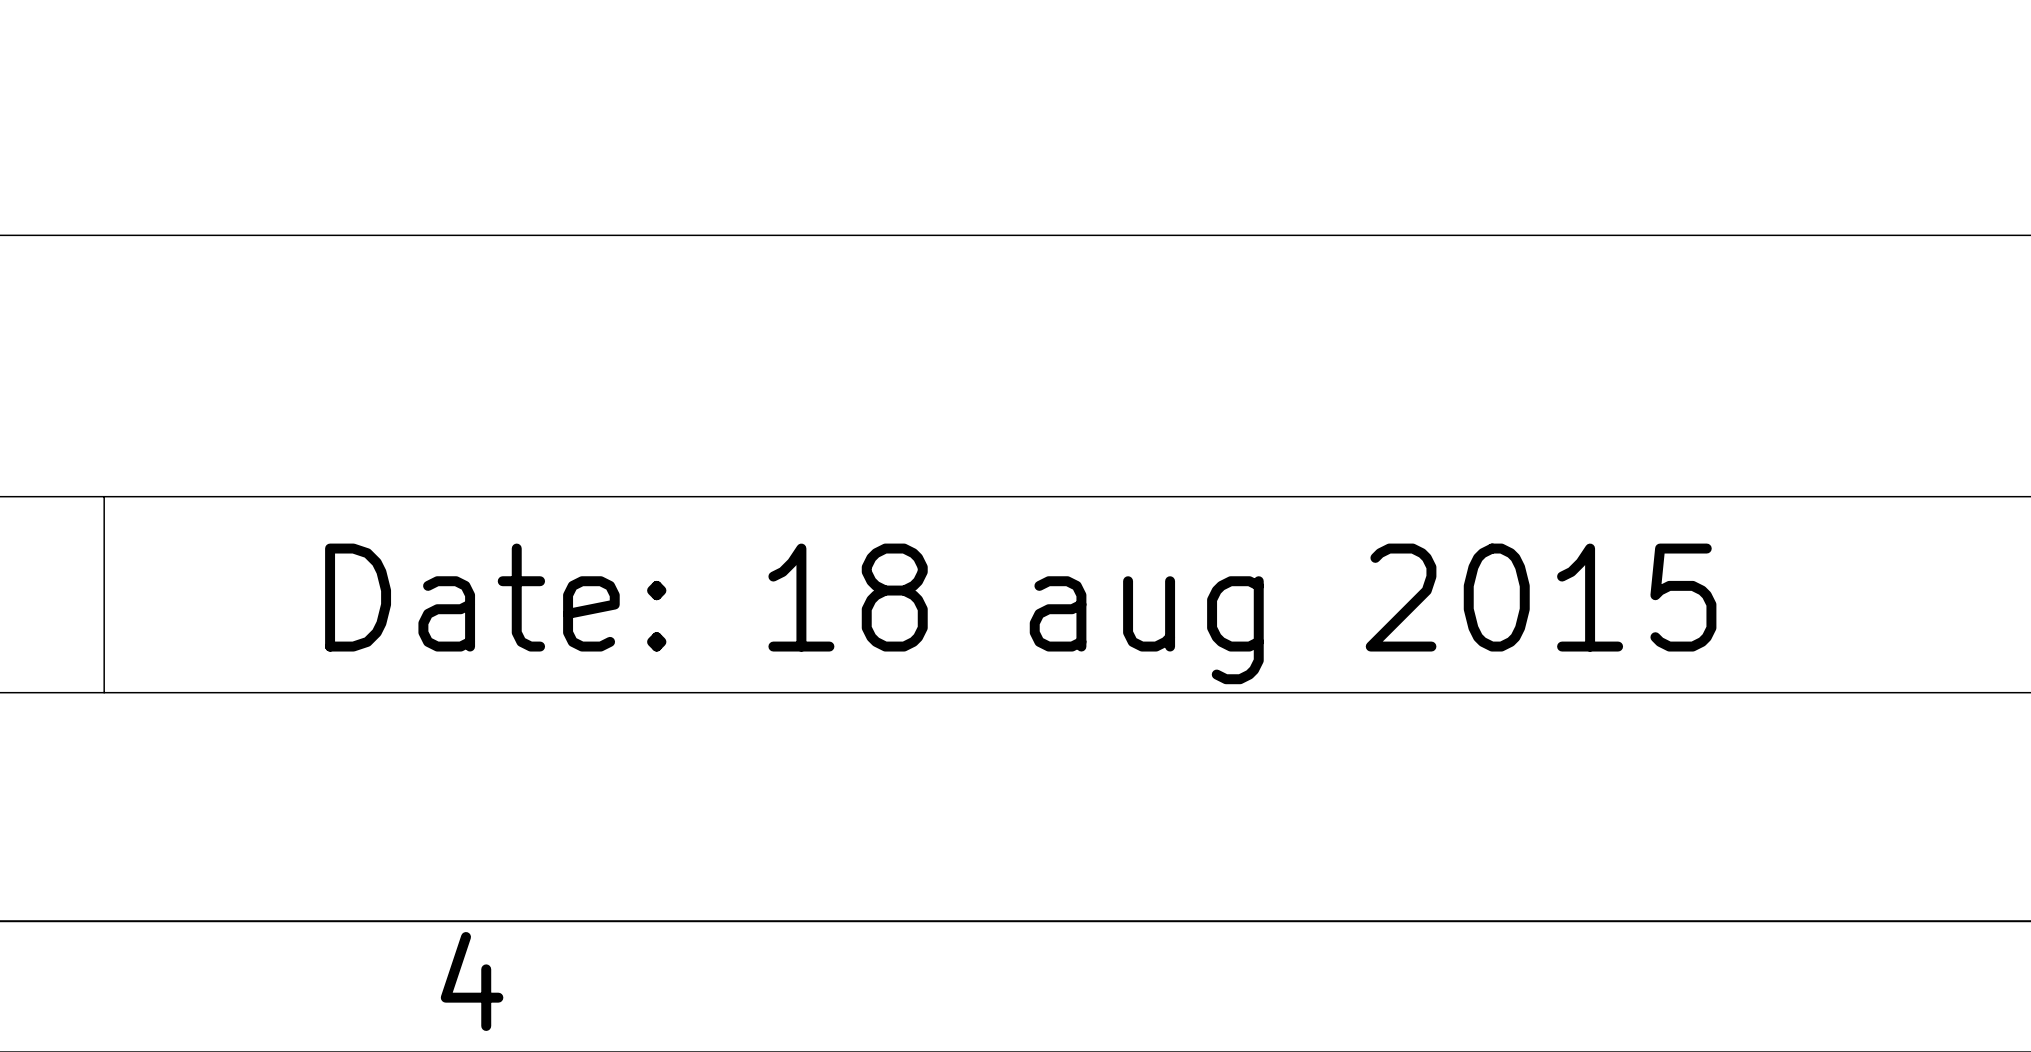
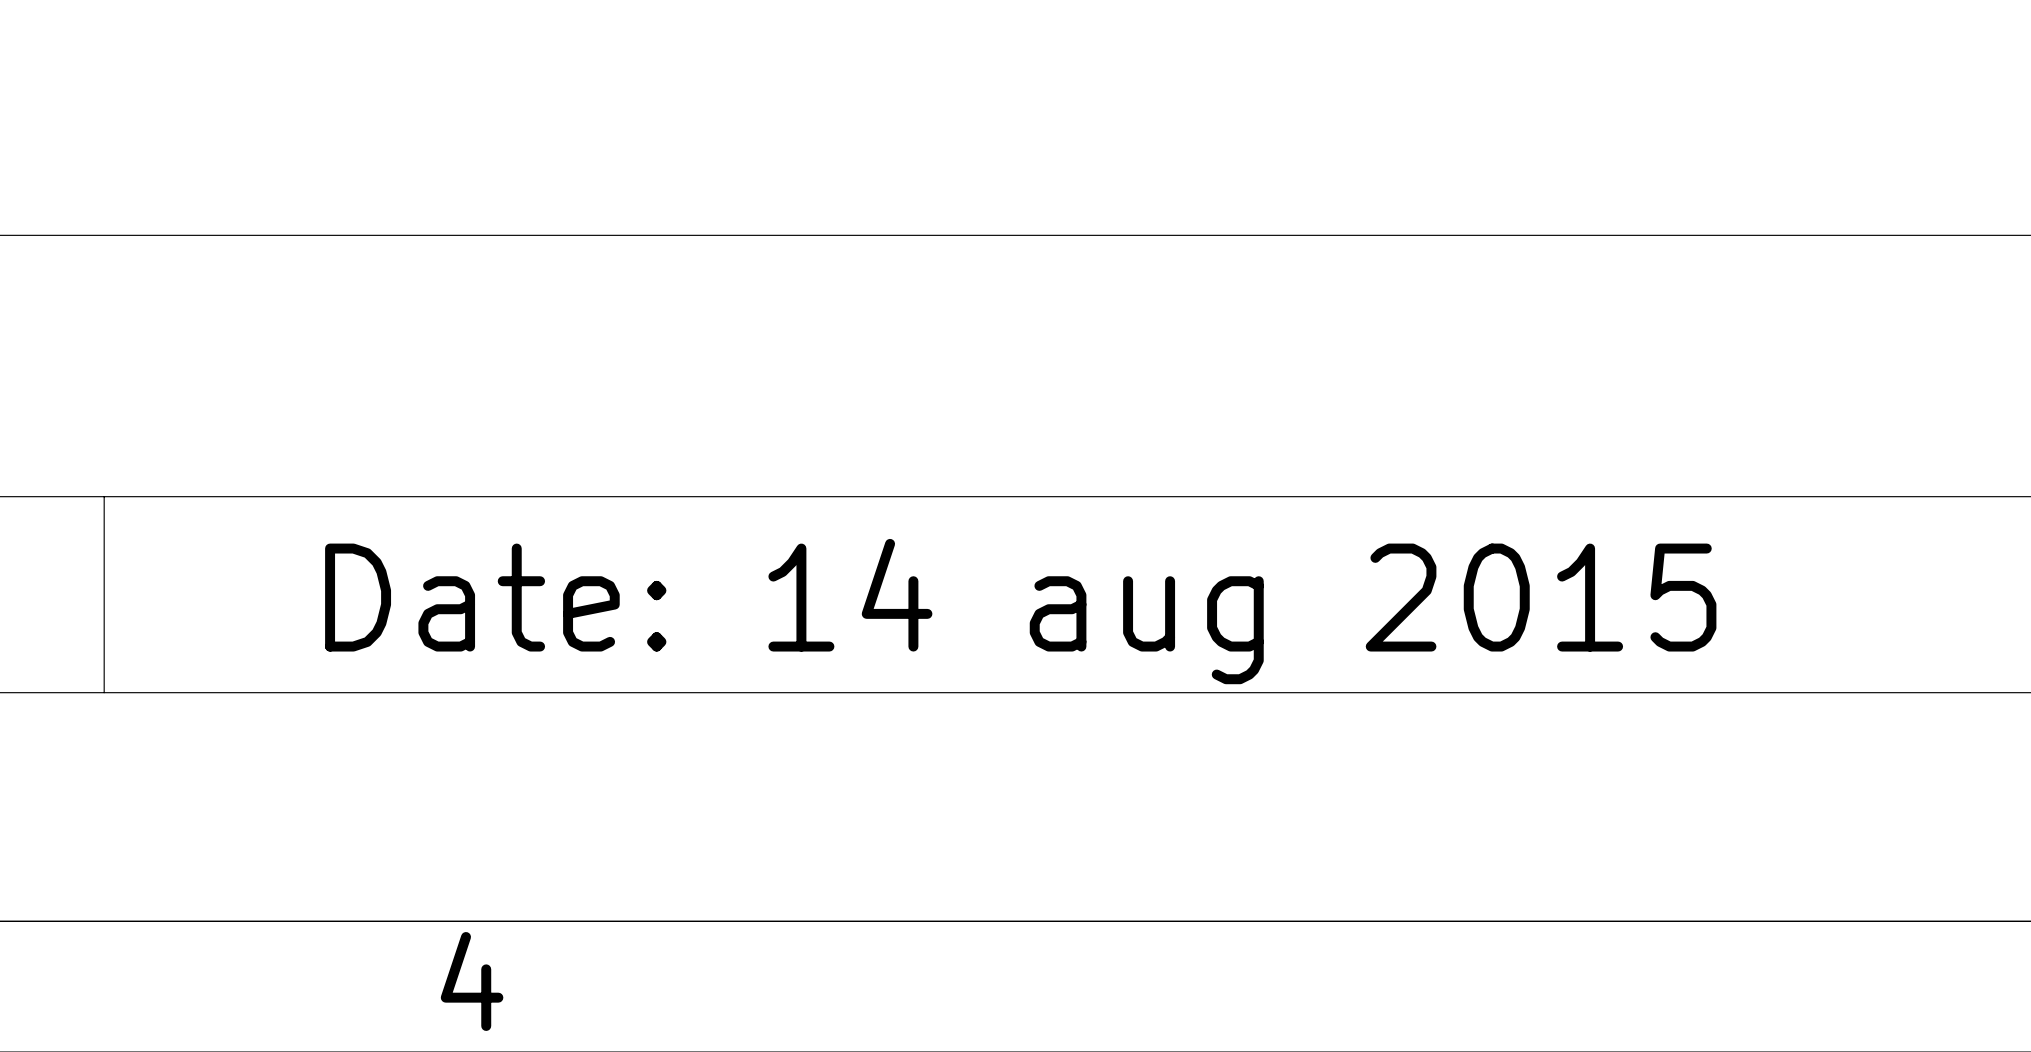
title block: Date: 18 aug 2015 (1020, 613) -> Date: 14 aug 2015 (1020, 611)

